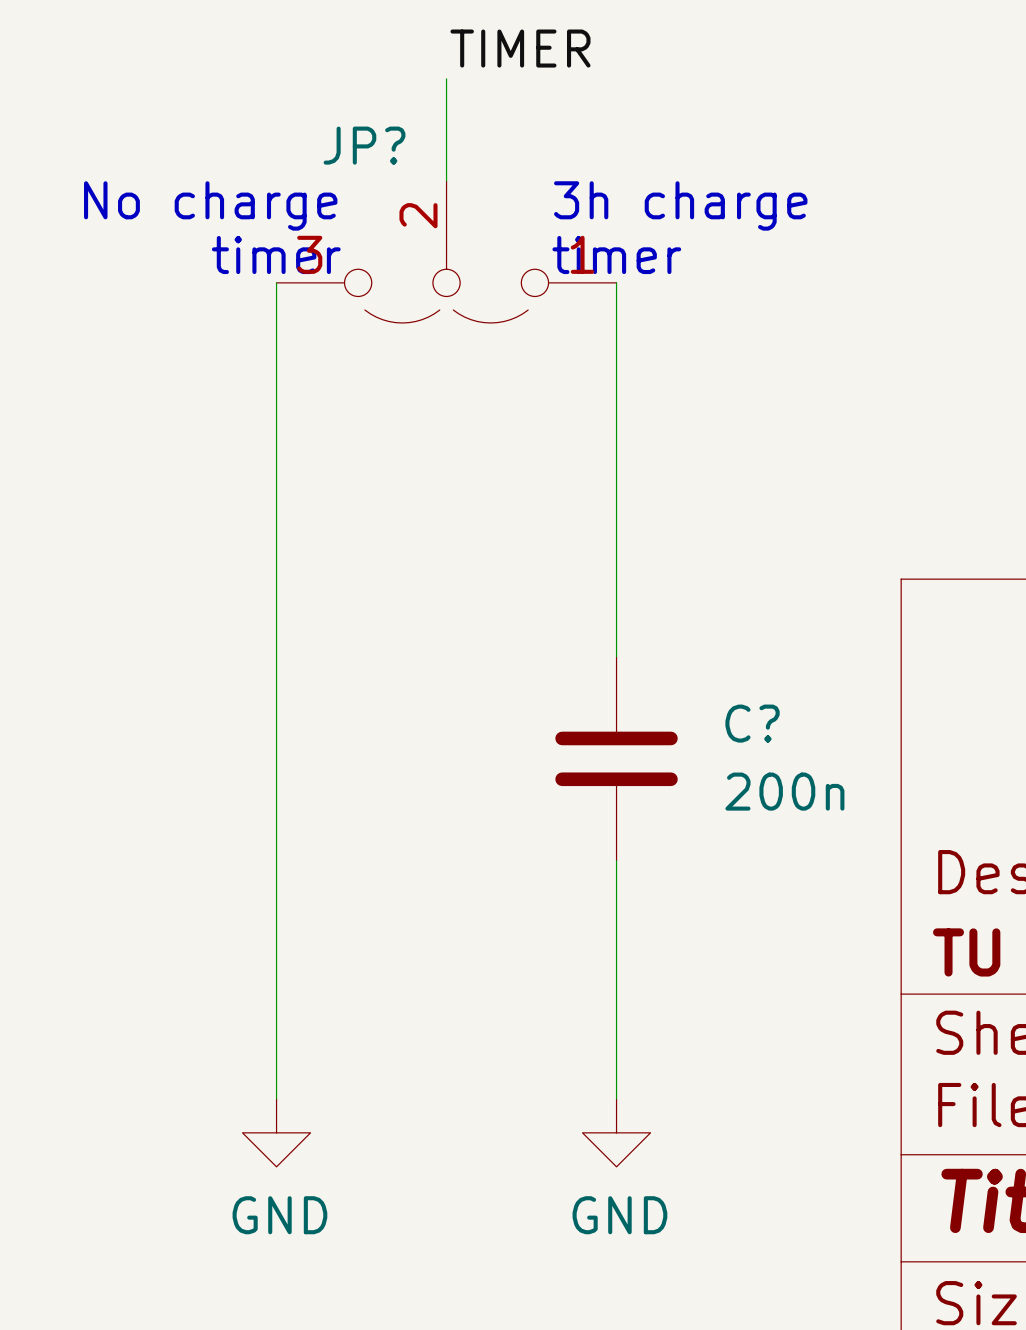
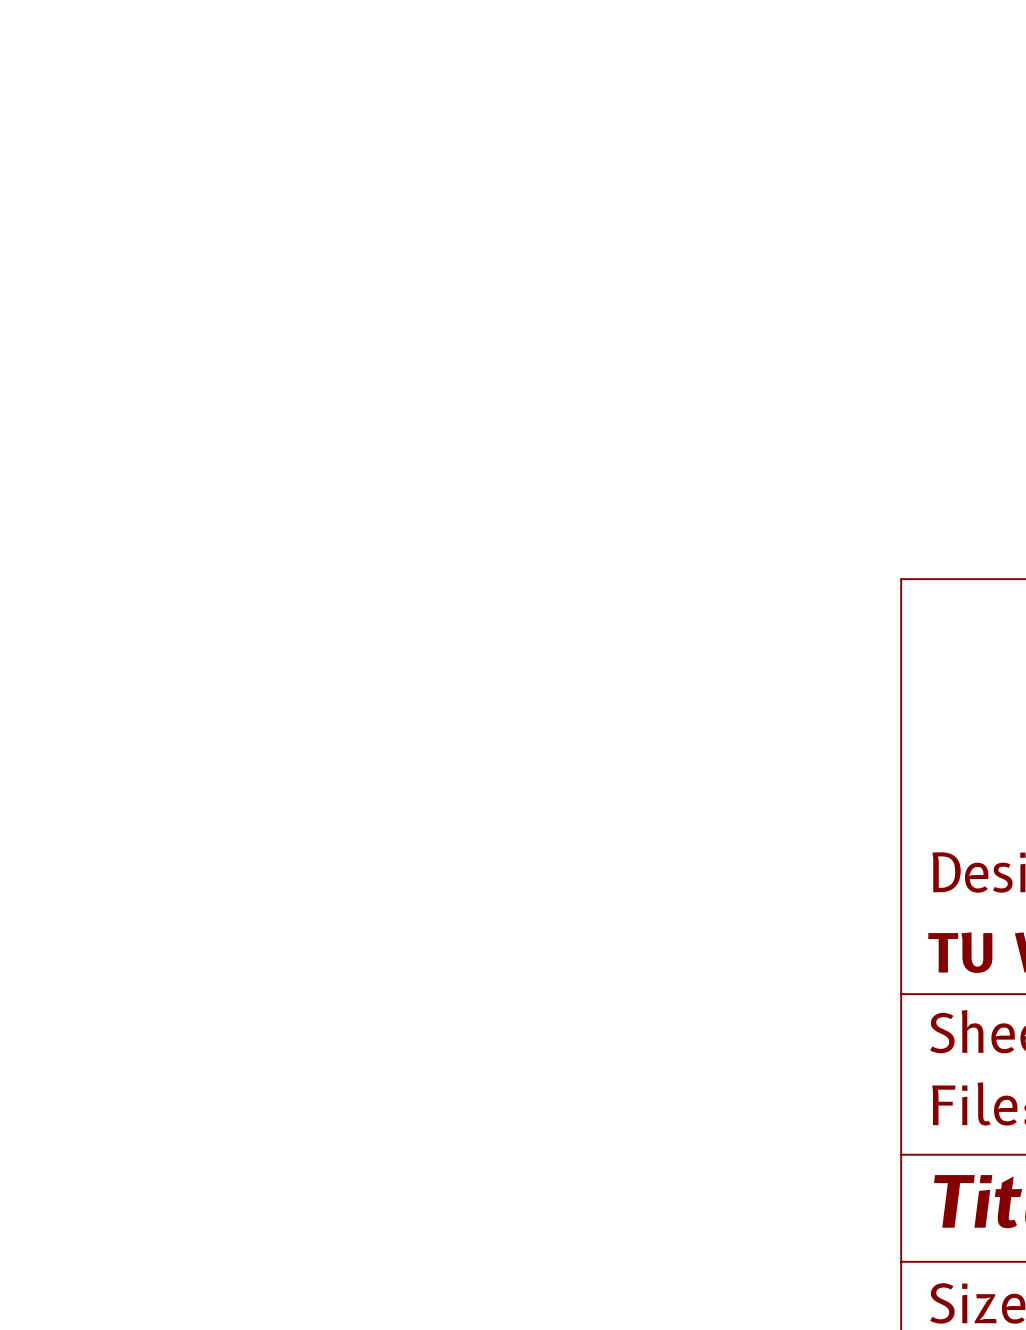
label: TIMER (520, 48) -> none
wire: (446, 78) (446, 180) -> none
text: No charge (210, 205) -> none
text: 3h charge (680, 205) -> none
JP?: (446, 251) -> none
text: timer (276, 255) -> none
text: timer (616, 255) -> none
wire: (276, 282) (276, 1098) -> none
wire: (616, 282) (616, 656) -> none
C?: 200n (616, 758) -> none
wire: (616, 860) (616, 1098) -> none
power symbol: GND (276, 1132) -> none
power symbol: GND (616, 1132) -> none

